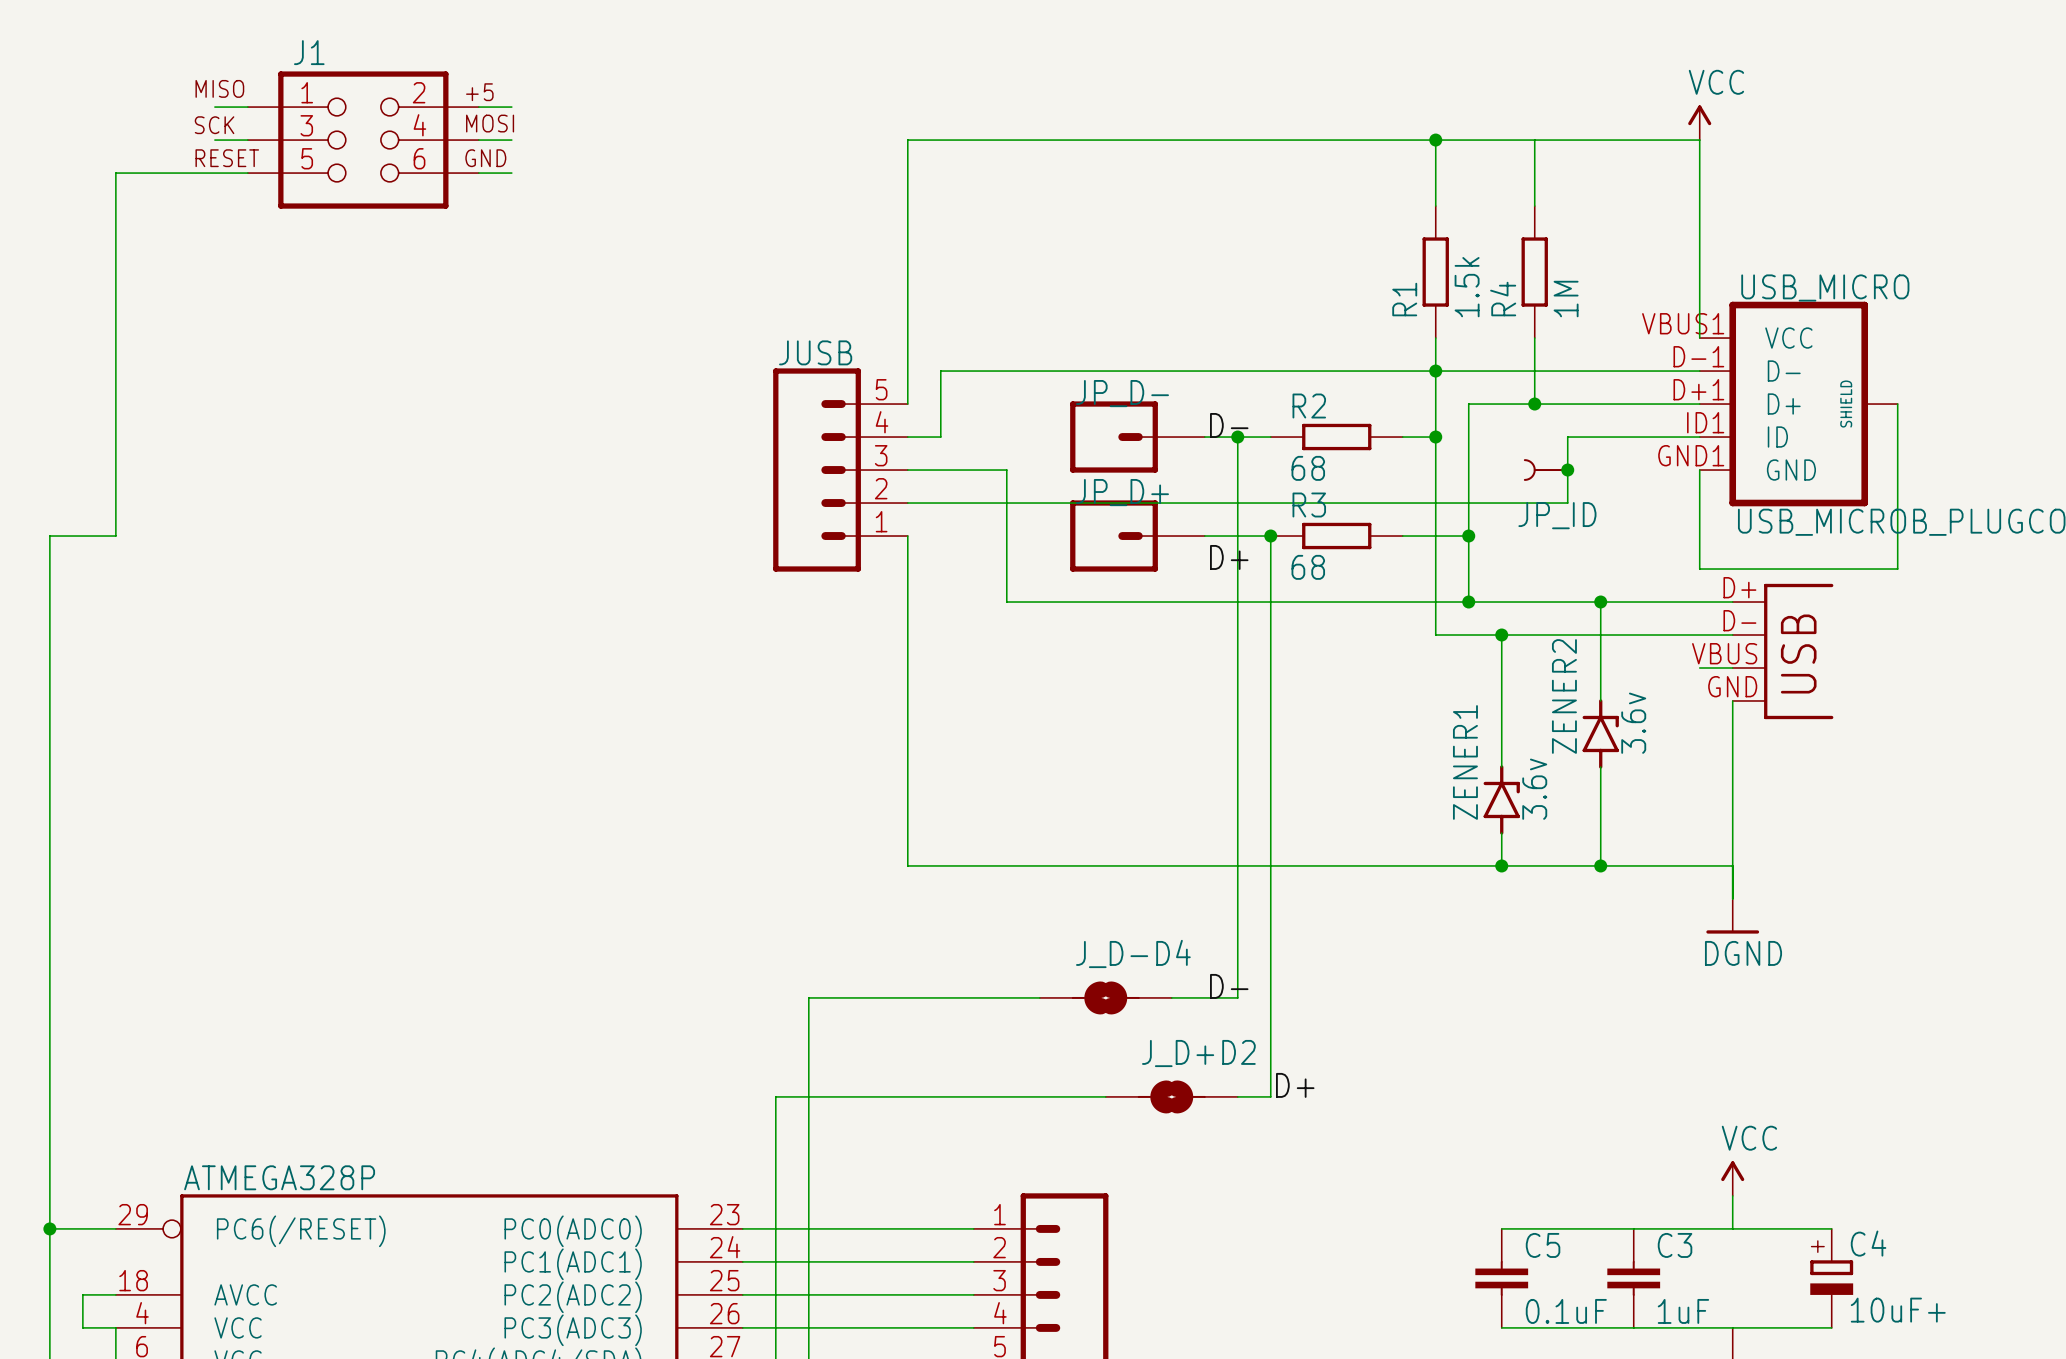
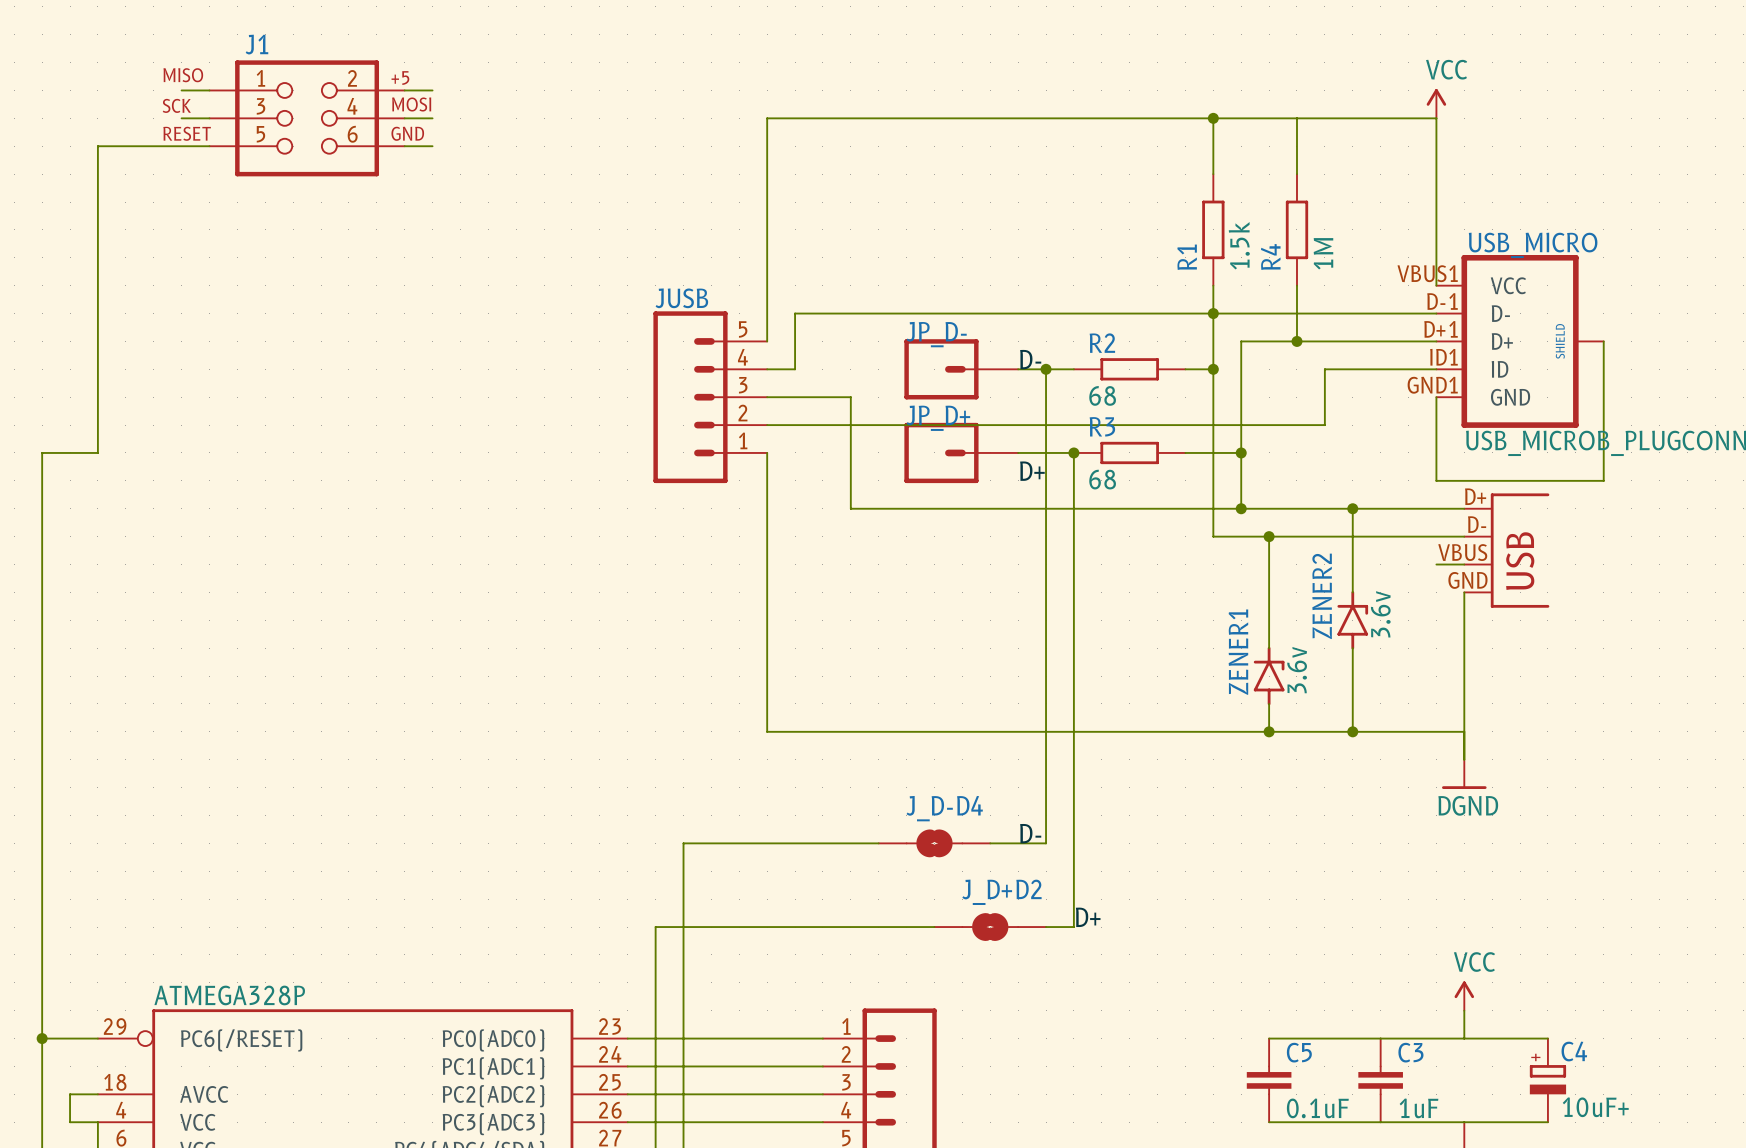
JP_ID: (1546, 470) -> none
junction: (1567, 470) -> none

